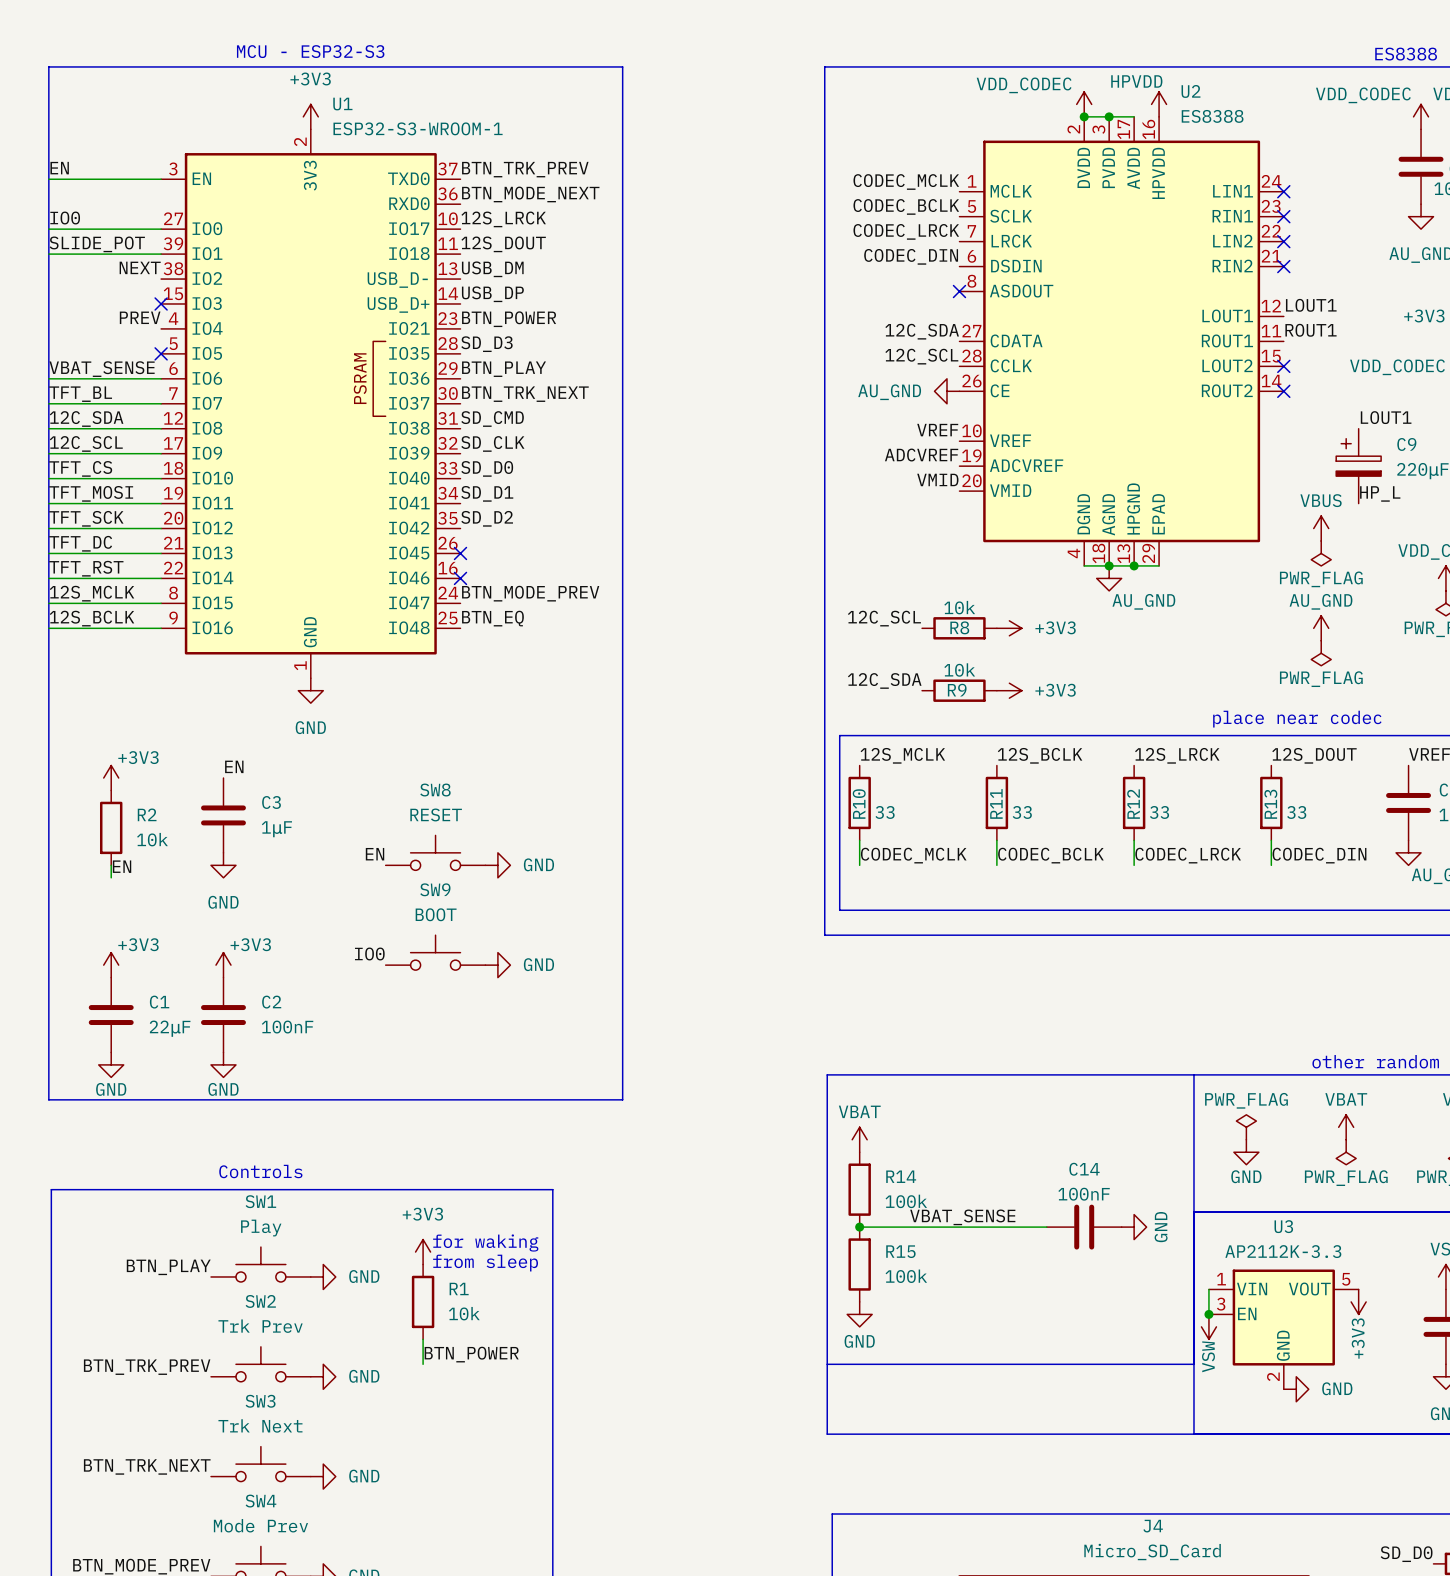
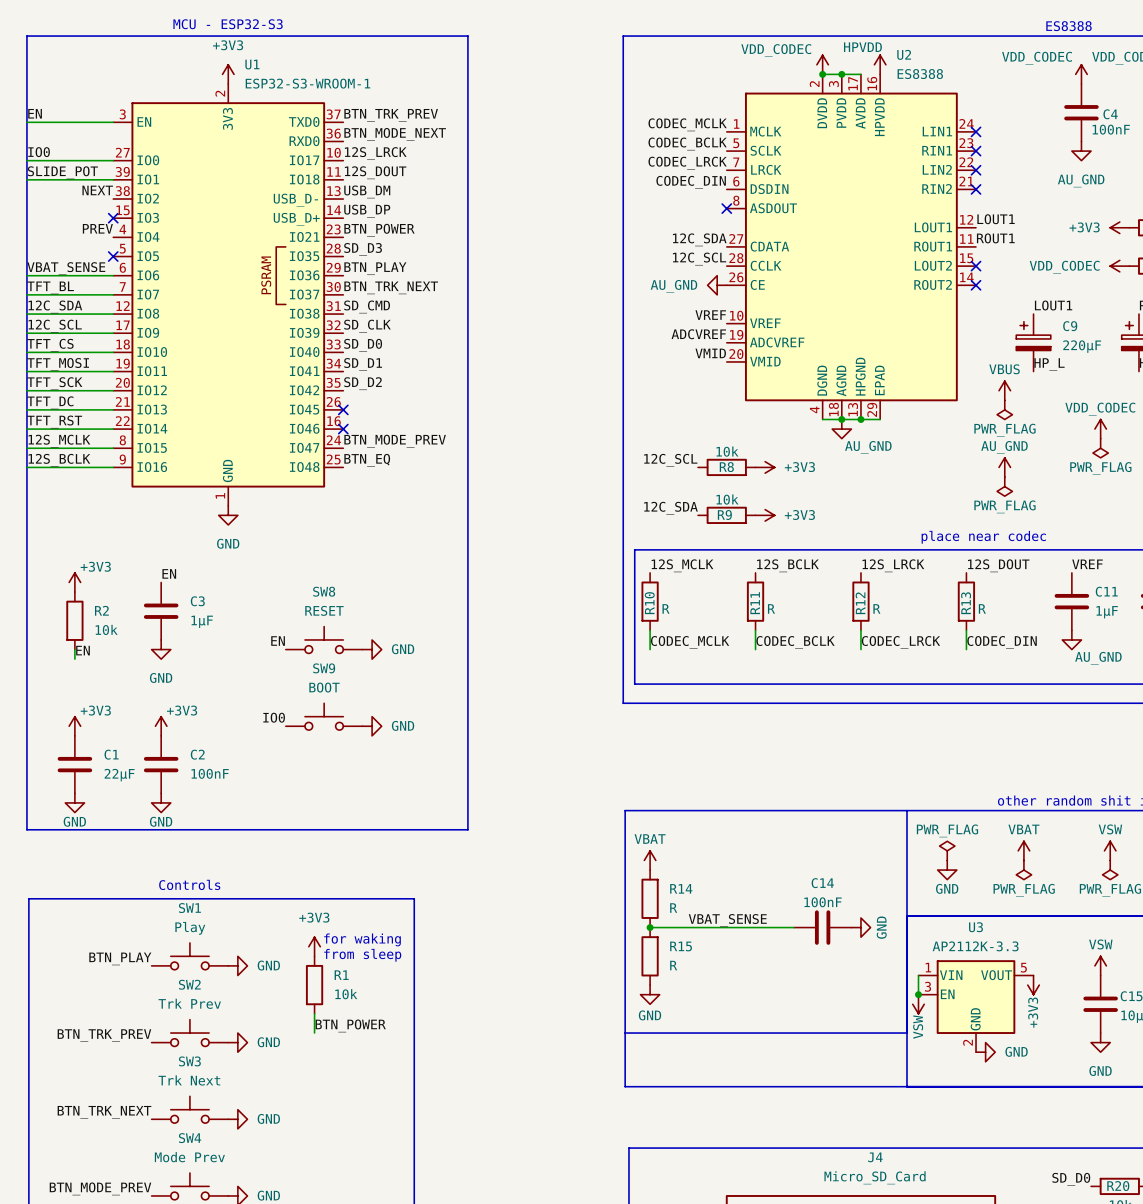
R10 value: 33 (885, 812) -> R (666, 608)
R11 value: 33 (1022, 812) -> R (771, 608)
R12 value: 33 (1159, 812) -> R (876, 608)
R13 value: 33 (1296, 812) -> R (982, 608)
R14 value: 100k (906, 1201) -> R (673, 908)
R15 value: 100k (906, 1276) -> R (673, 965)

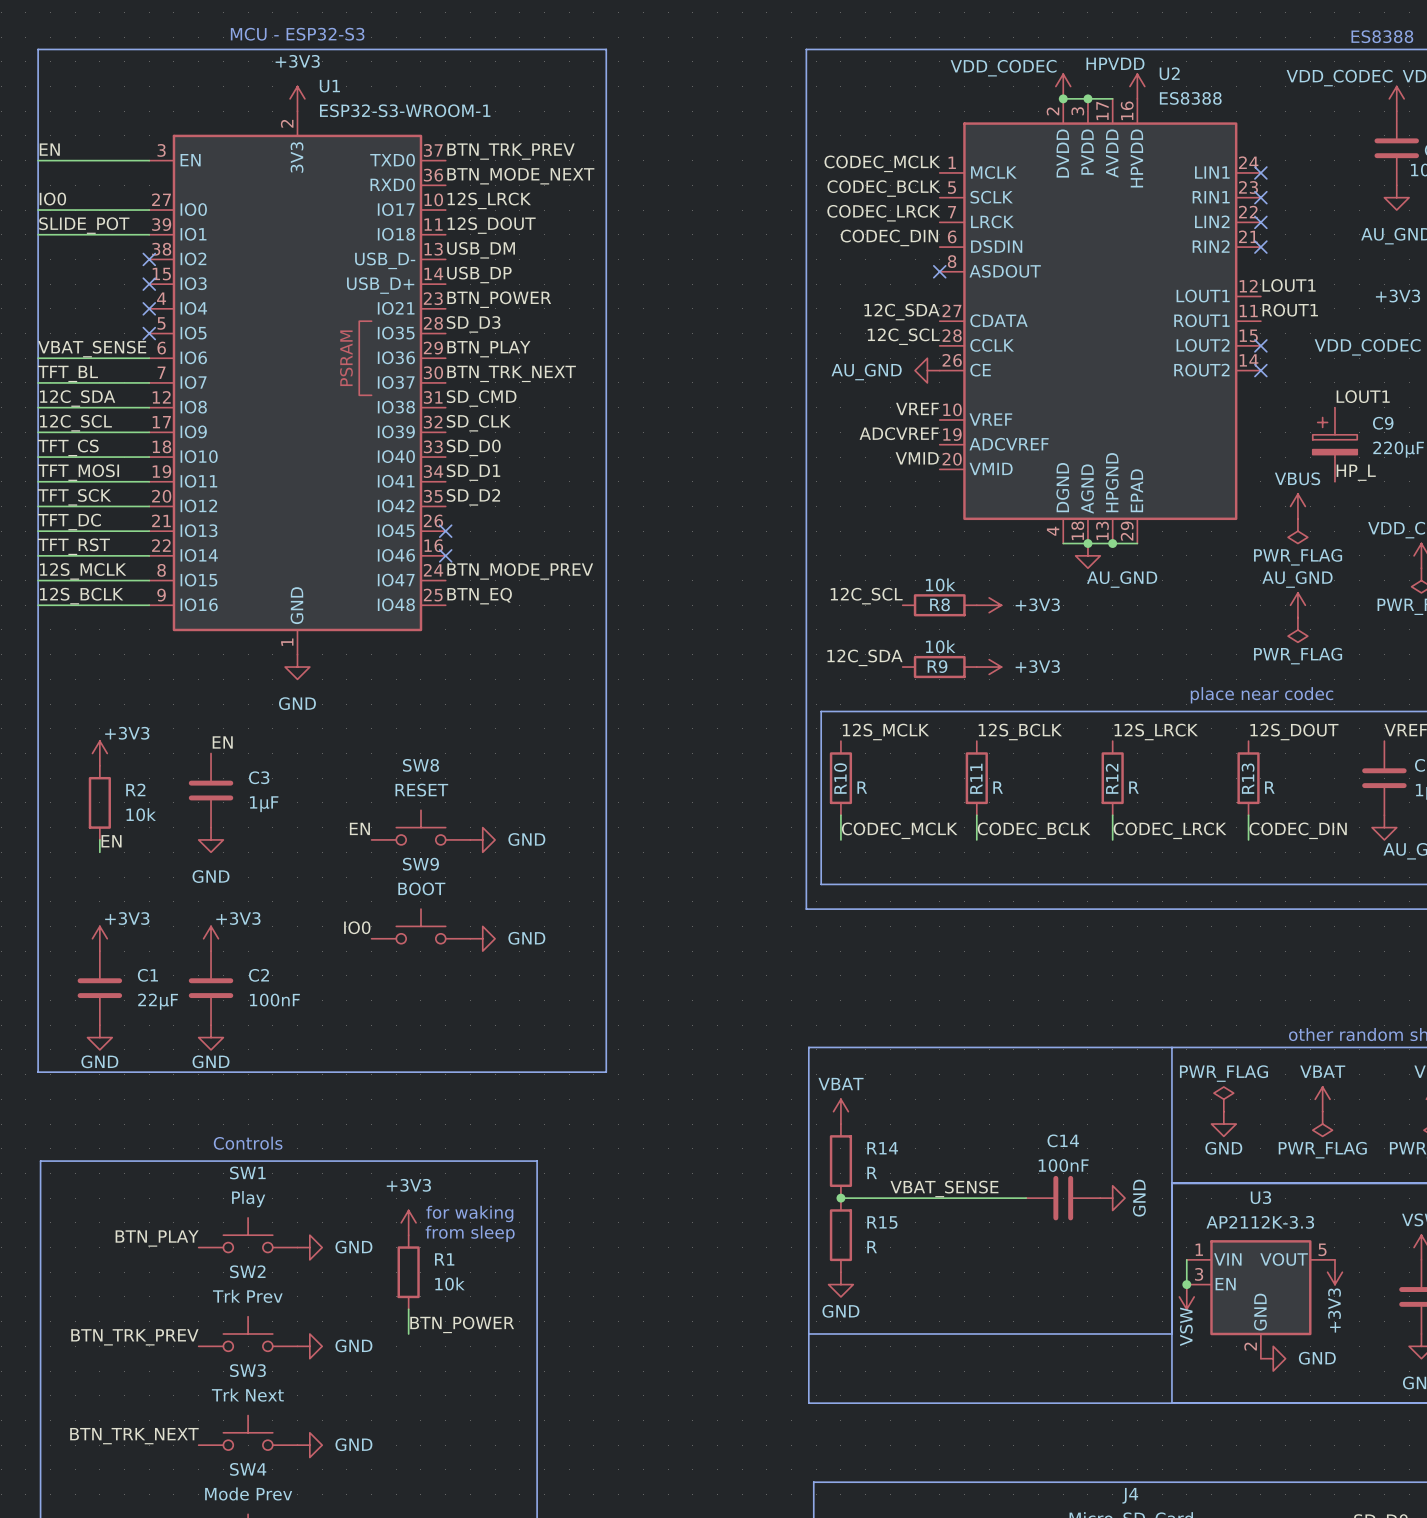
label: NEXT (97, 190) -> none
no-connect mark: none -> (149, 259)
label: PREV (97, 228) -> none
no-connect mark: none -> (149, 308)

